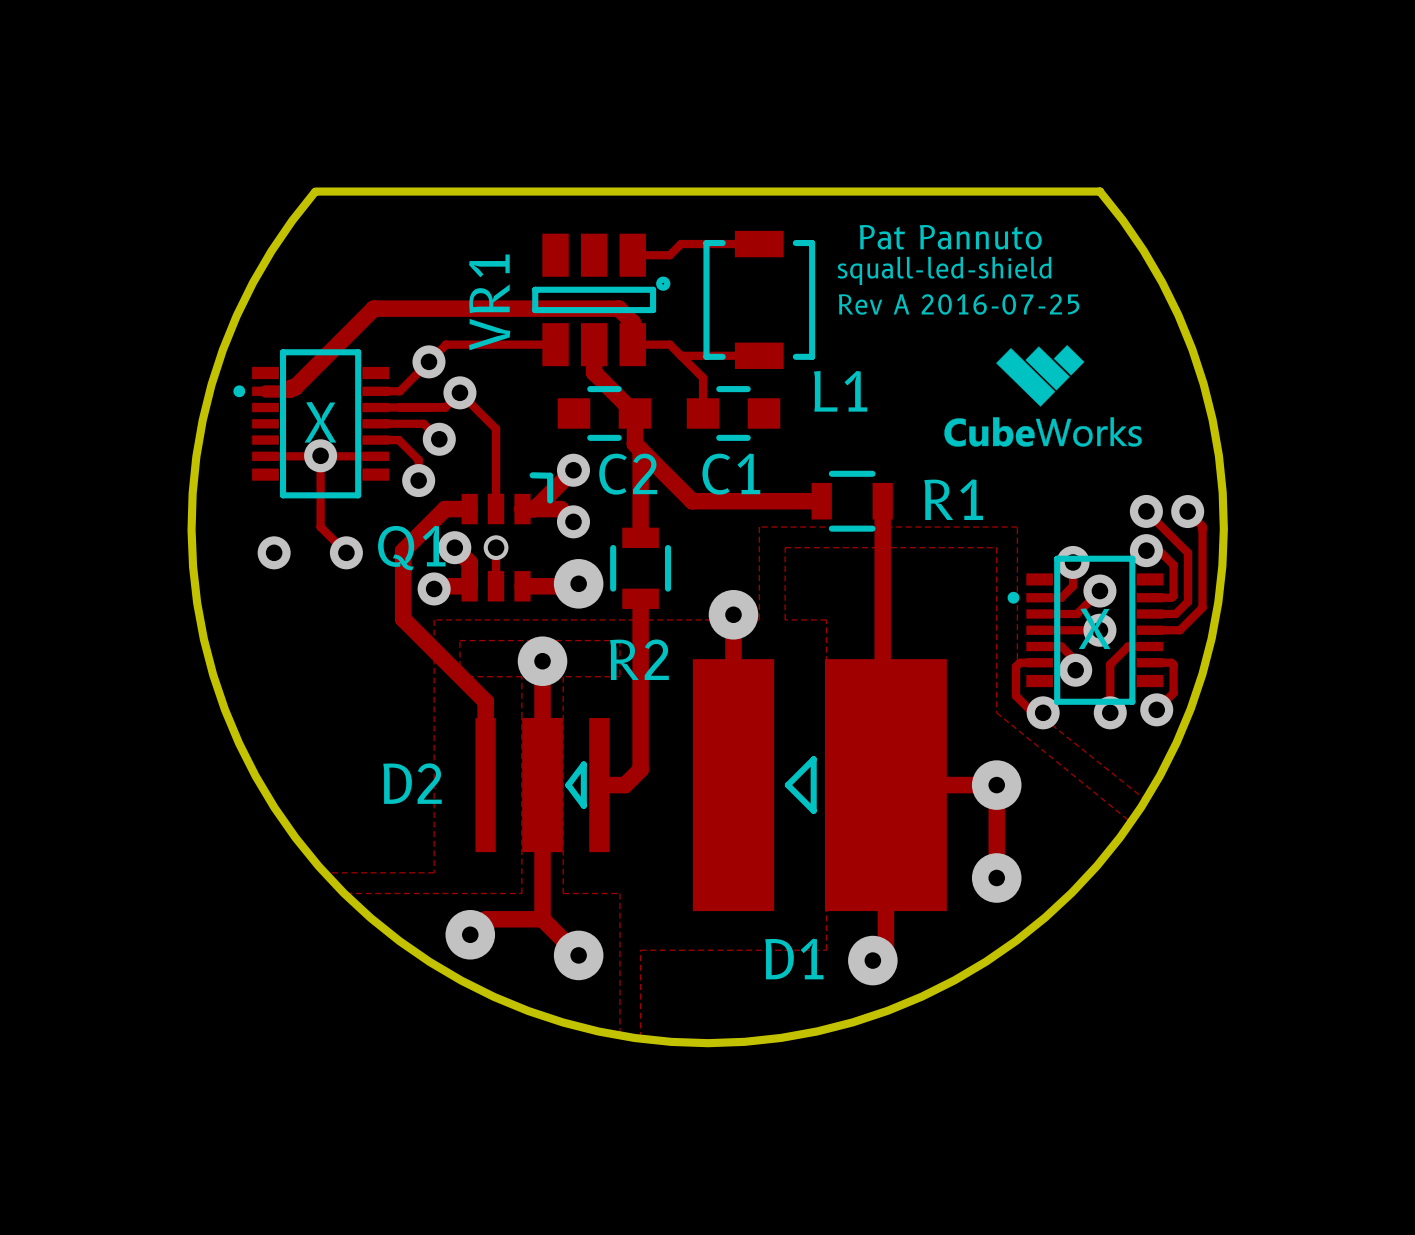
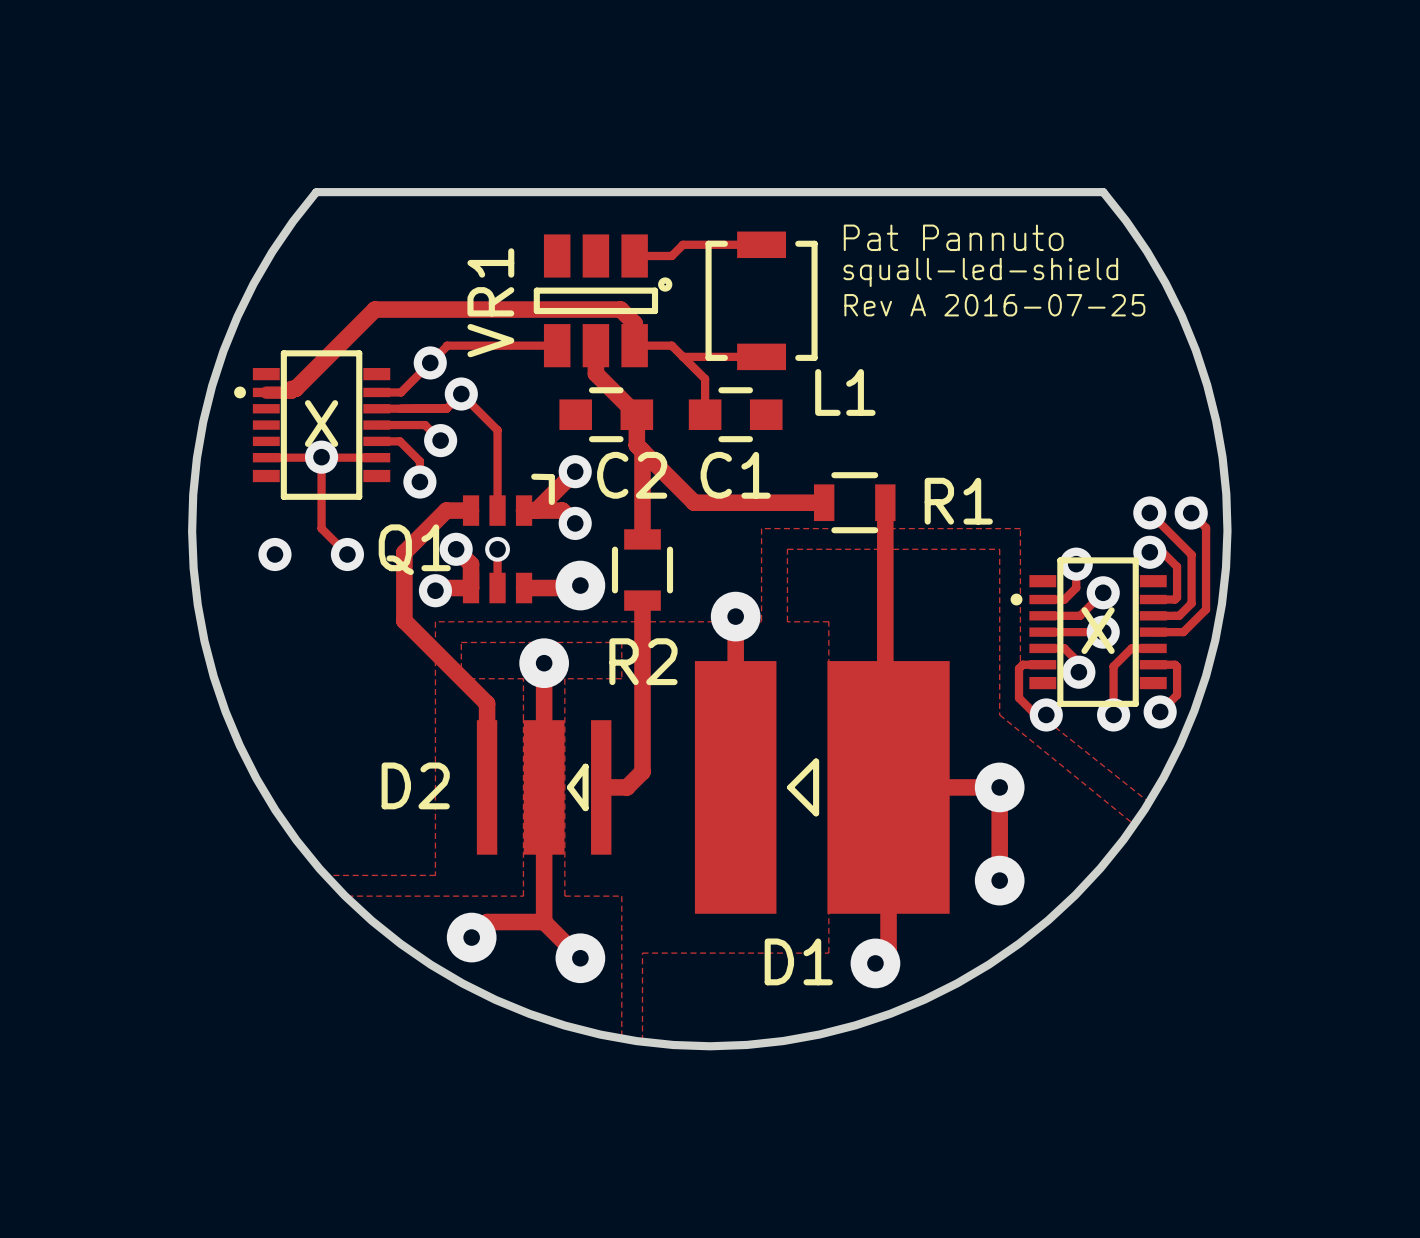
drawing: [944, 345, 1142, 447] -> none

